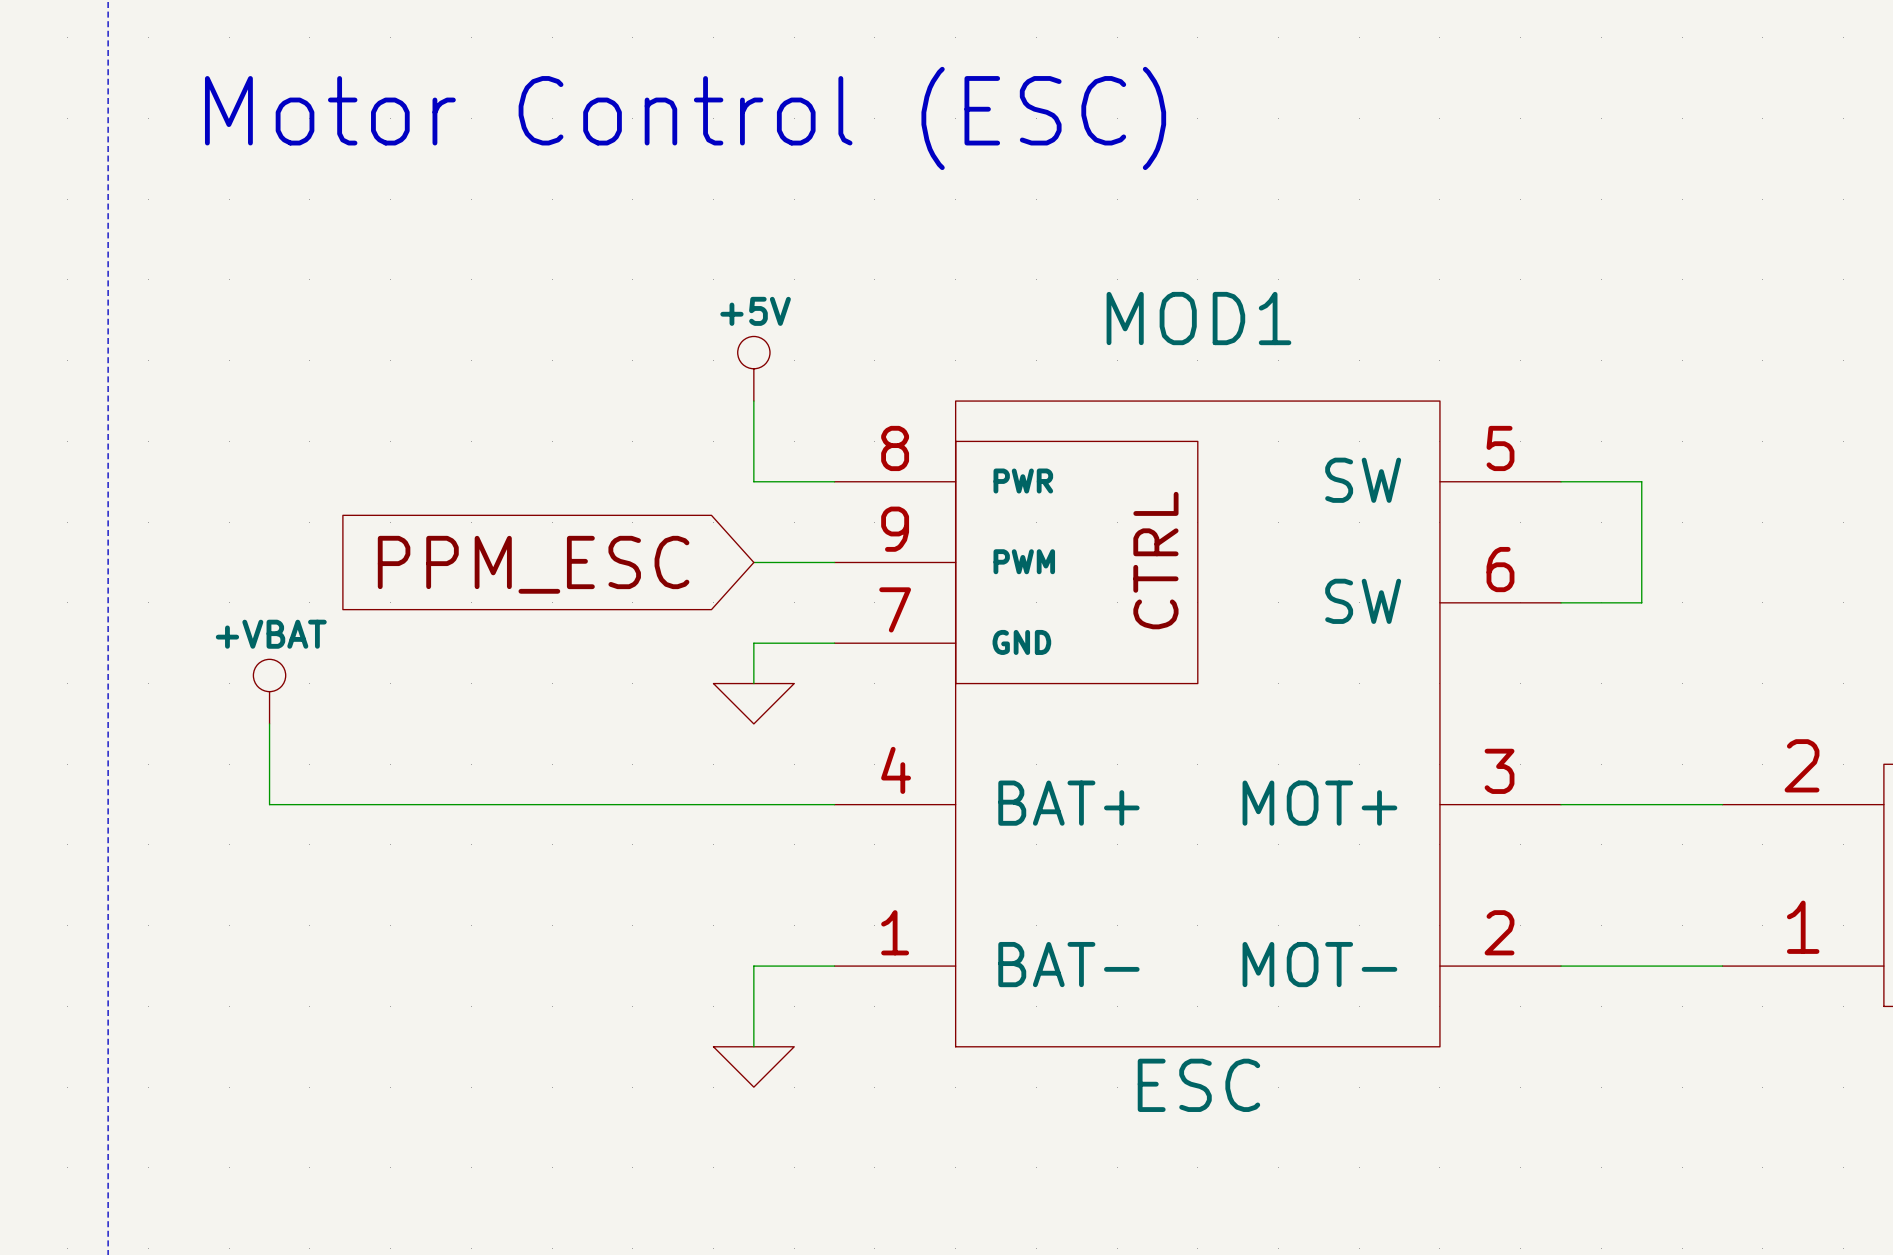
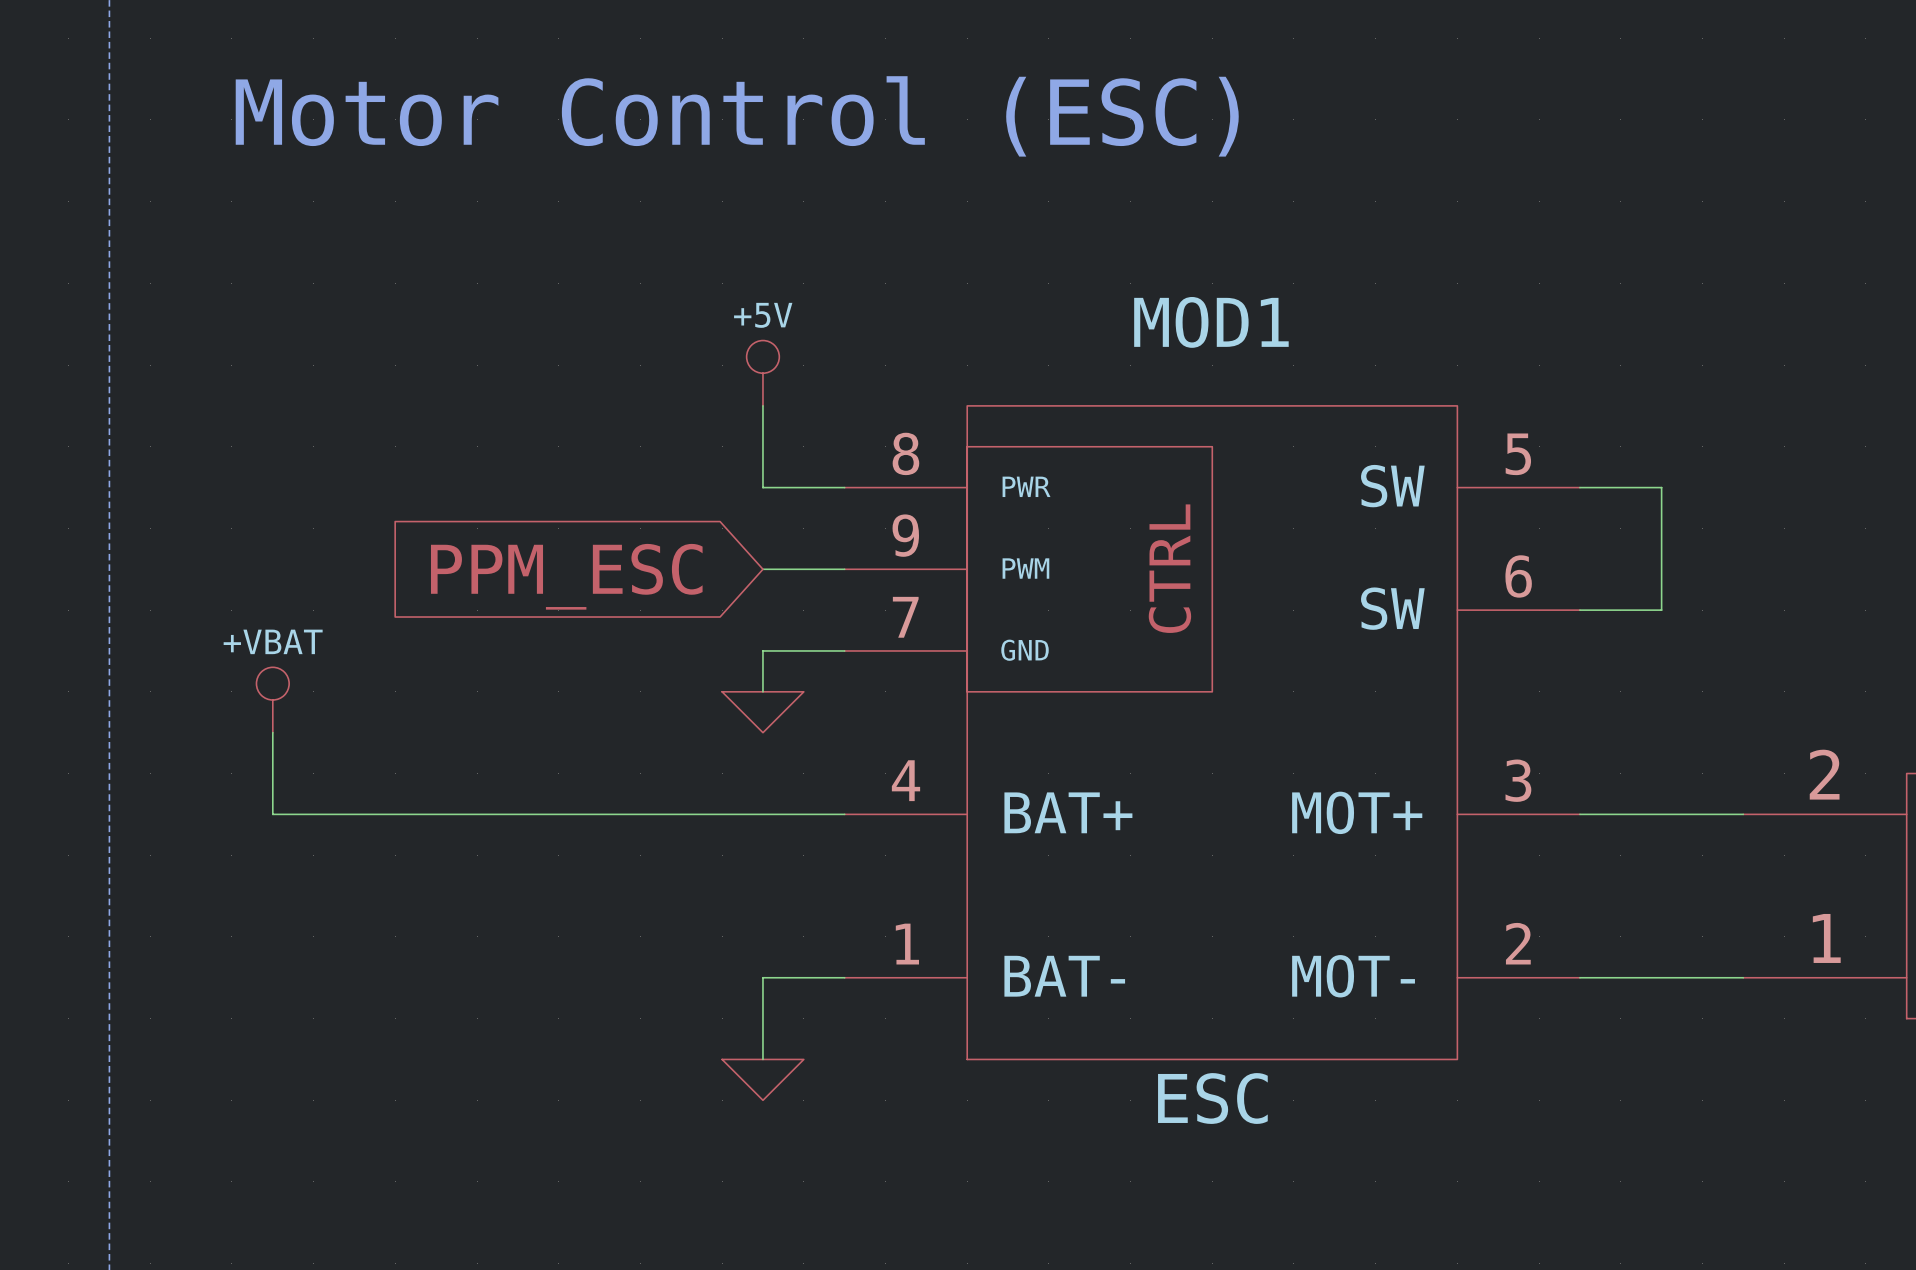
text position: Motor Control (ESC) (685, 118) -> Motor Control (ESC) (737, 116)

